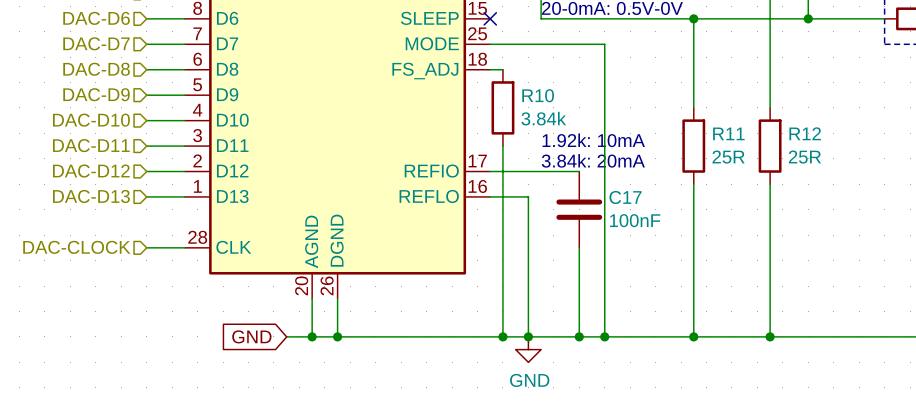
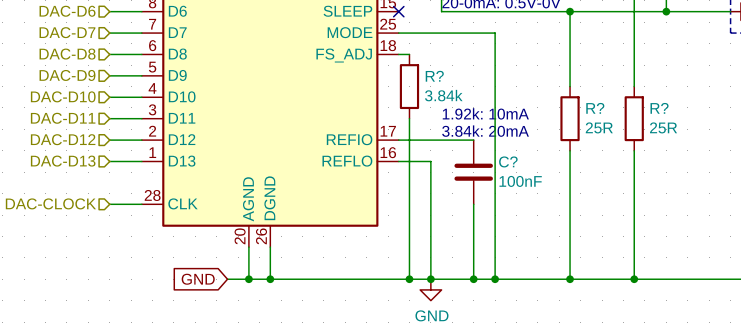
R10 name: R10 (538, 95) -> R? (434, 76)
R11 name: R11 (728, 133) -> R? (595, 108)
R12 name: R12 (805, 133) -> R? (659, 108)
C17 name: C17 (625, 197) -> C? (508, 161)

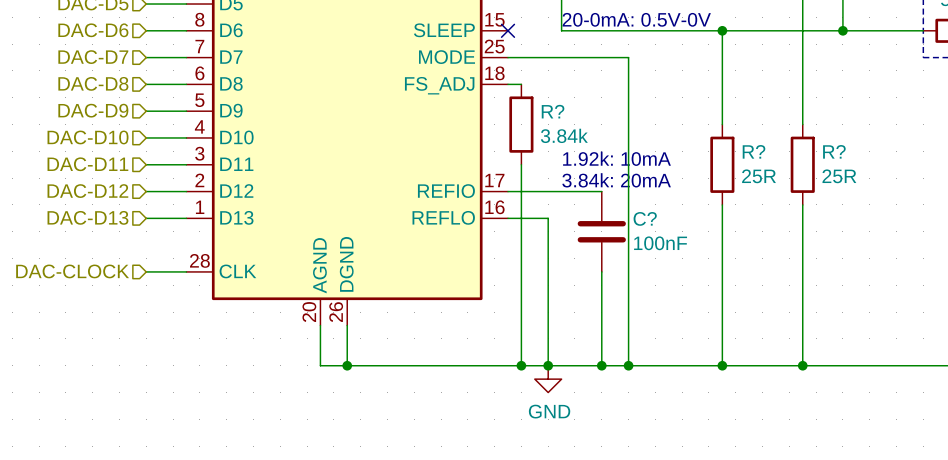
global label: GND (198, 279) -> none
wire: (227, 279) (248, 279) -> none
junction: (248, 279) -> none

